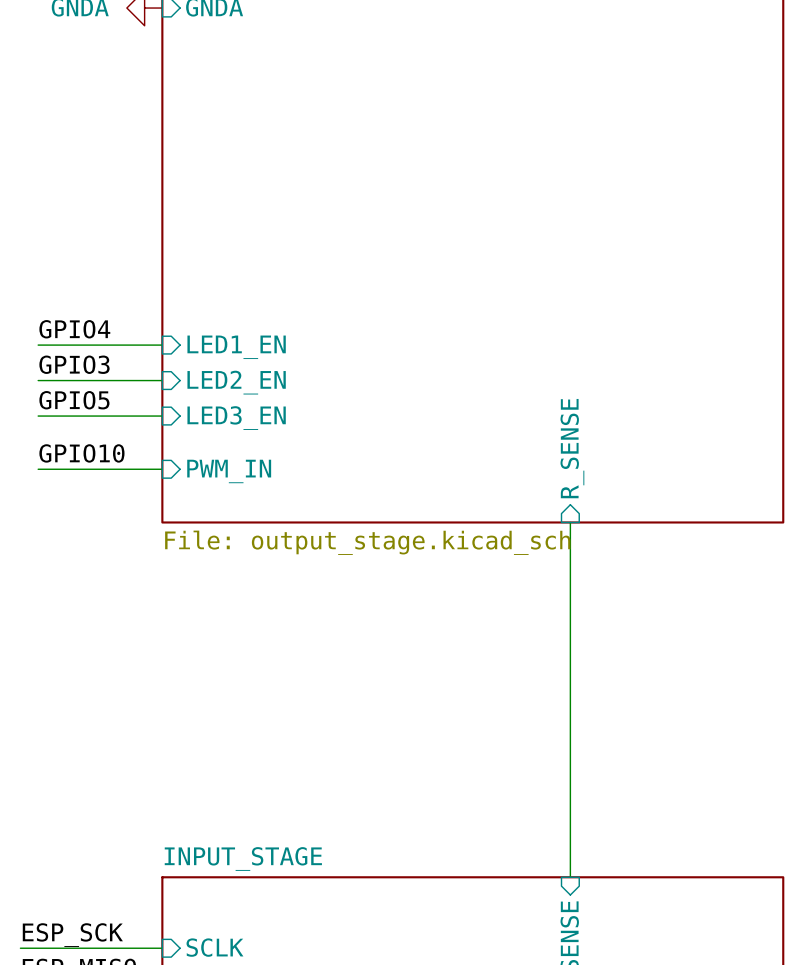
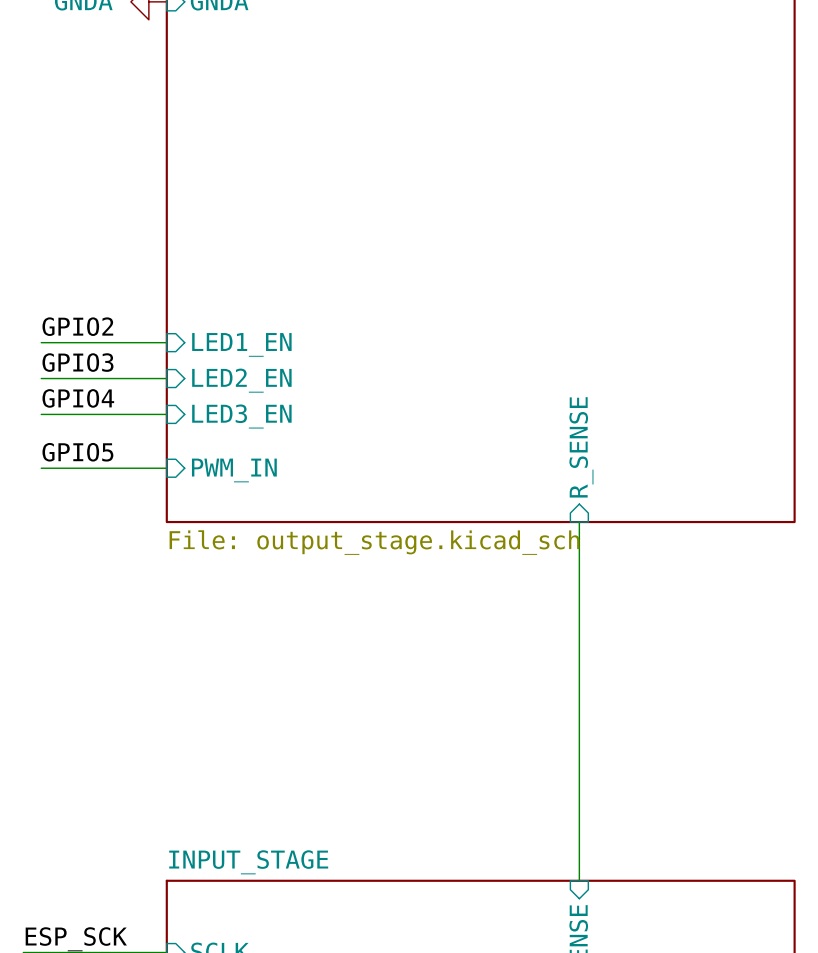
label: GPIO4 (74, 329) -> GPIO2 (77, 326)
label: GPIO5 (74, 400) -> GPIO4 (78, 398)
label: GPIO10 (81, 453) -> GPIO5 (77, 452)

